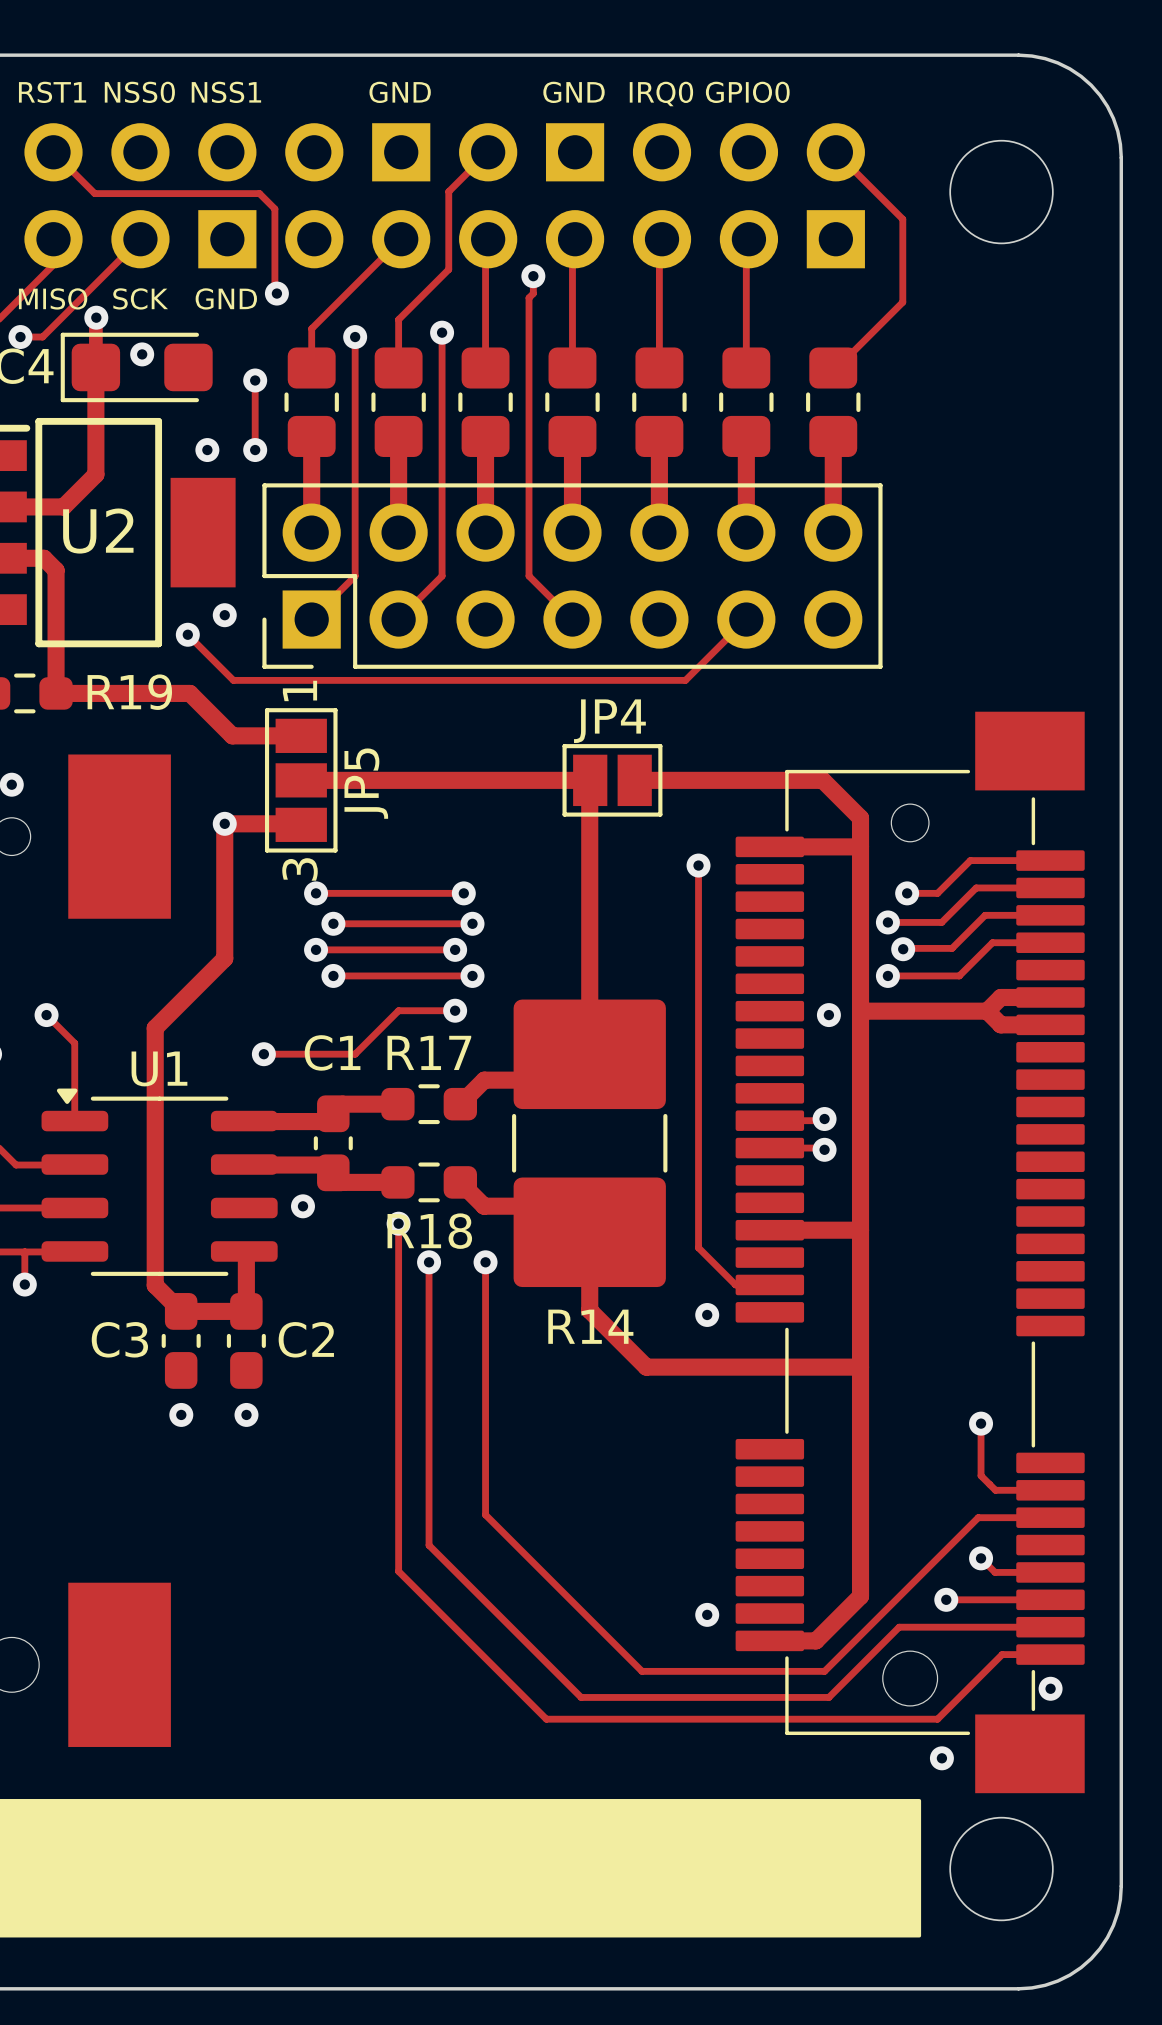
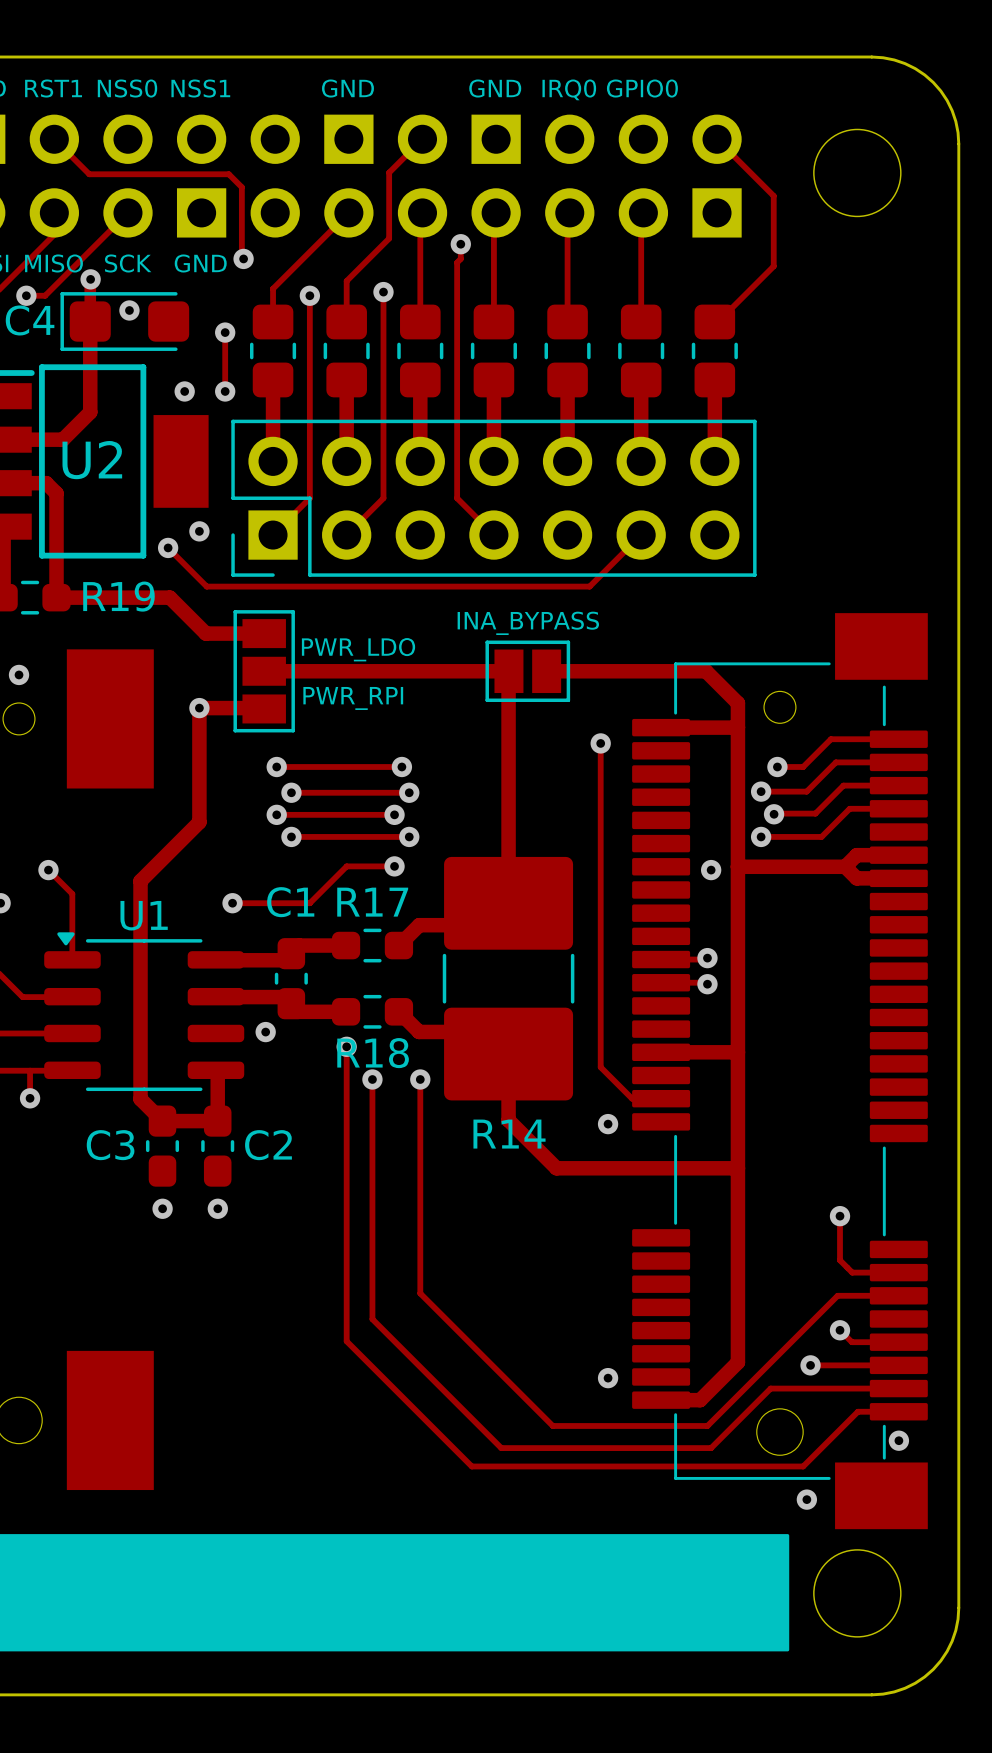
JP5 text: 1 (299, 690) -> none
JP4 name: JP4 (609, 721) -> none
text: none -> INA_BYPASS (528, 623)
text: none -> PWR_LDO (358, 649)
JP5 name: JP5 (366, 783) -> none
text: none -> PWR_RPI (353, 698)
JP5 text: 3 (300, 869) -> none

